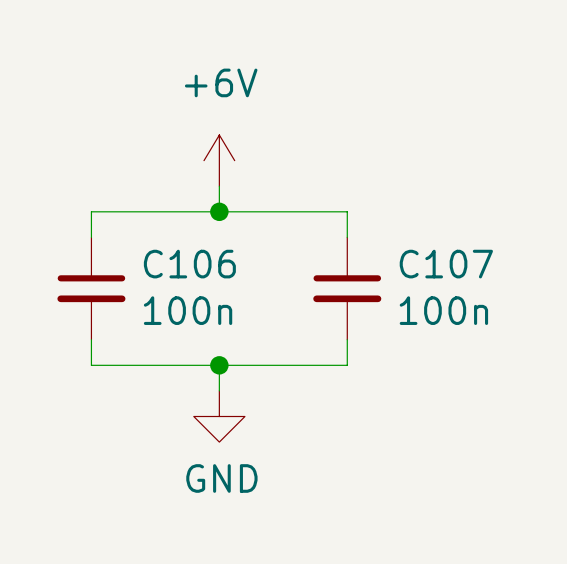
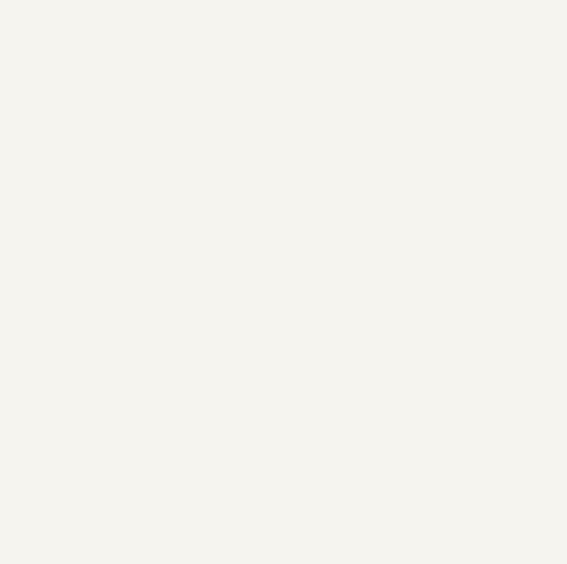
power symbol: +6V (219, 160) -> none
wire: (219, 186) (219, 211) -> none
junction: (219, 211) -> none
wire: (91, 237) (91, 211) (347, 211) (347, 237) -> none
C106: 100n (91, 288) -> none
C107: 100n (347, 288) -> none
wire: (91, 339) (91, 365) (347, 365) (347, 339) -> none
wire: (219, 365) (219, 390) -> none
junction: (219, 365) -> none
power symbol: GND (219, 416) -> none

